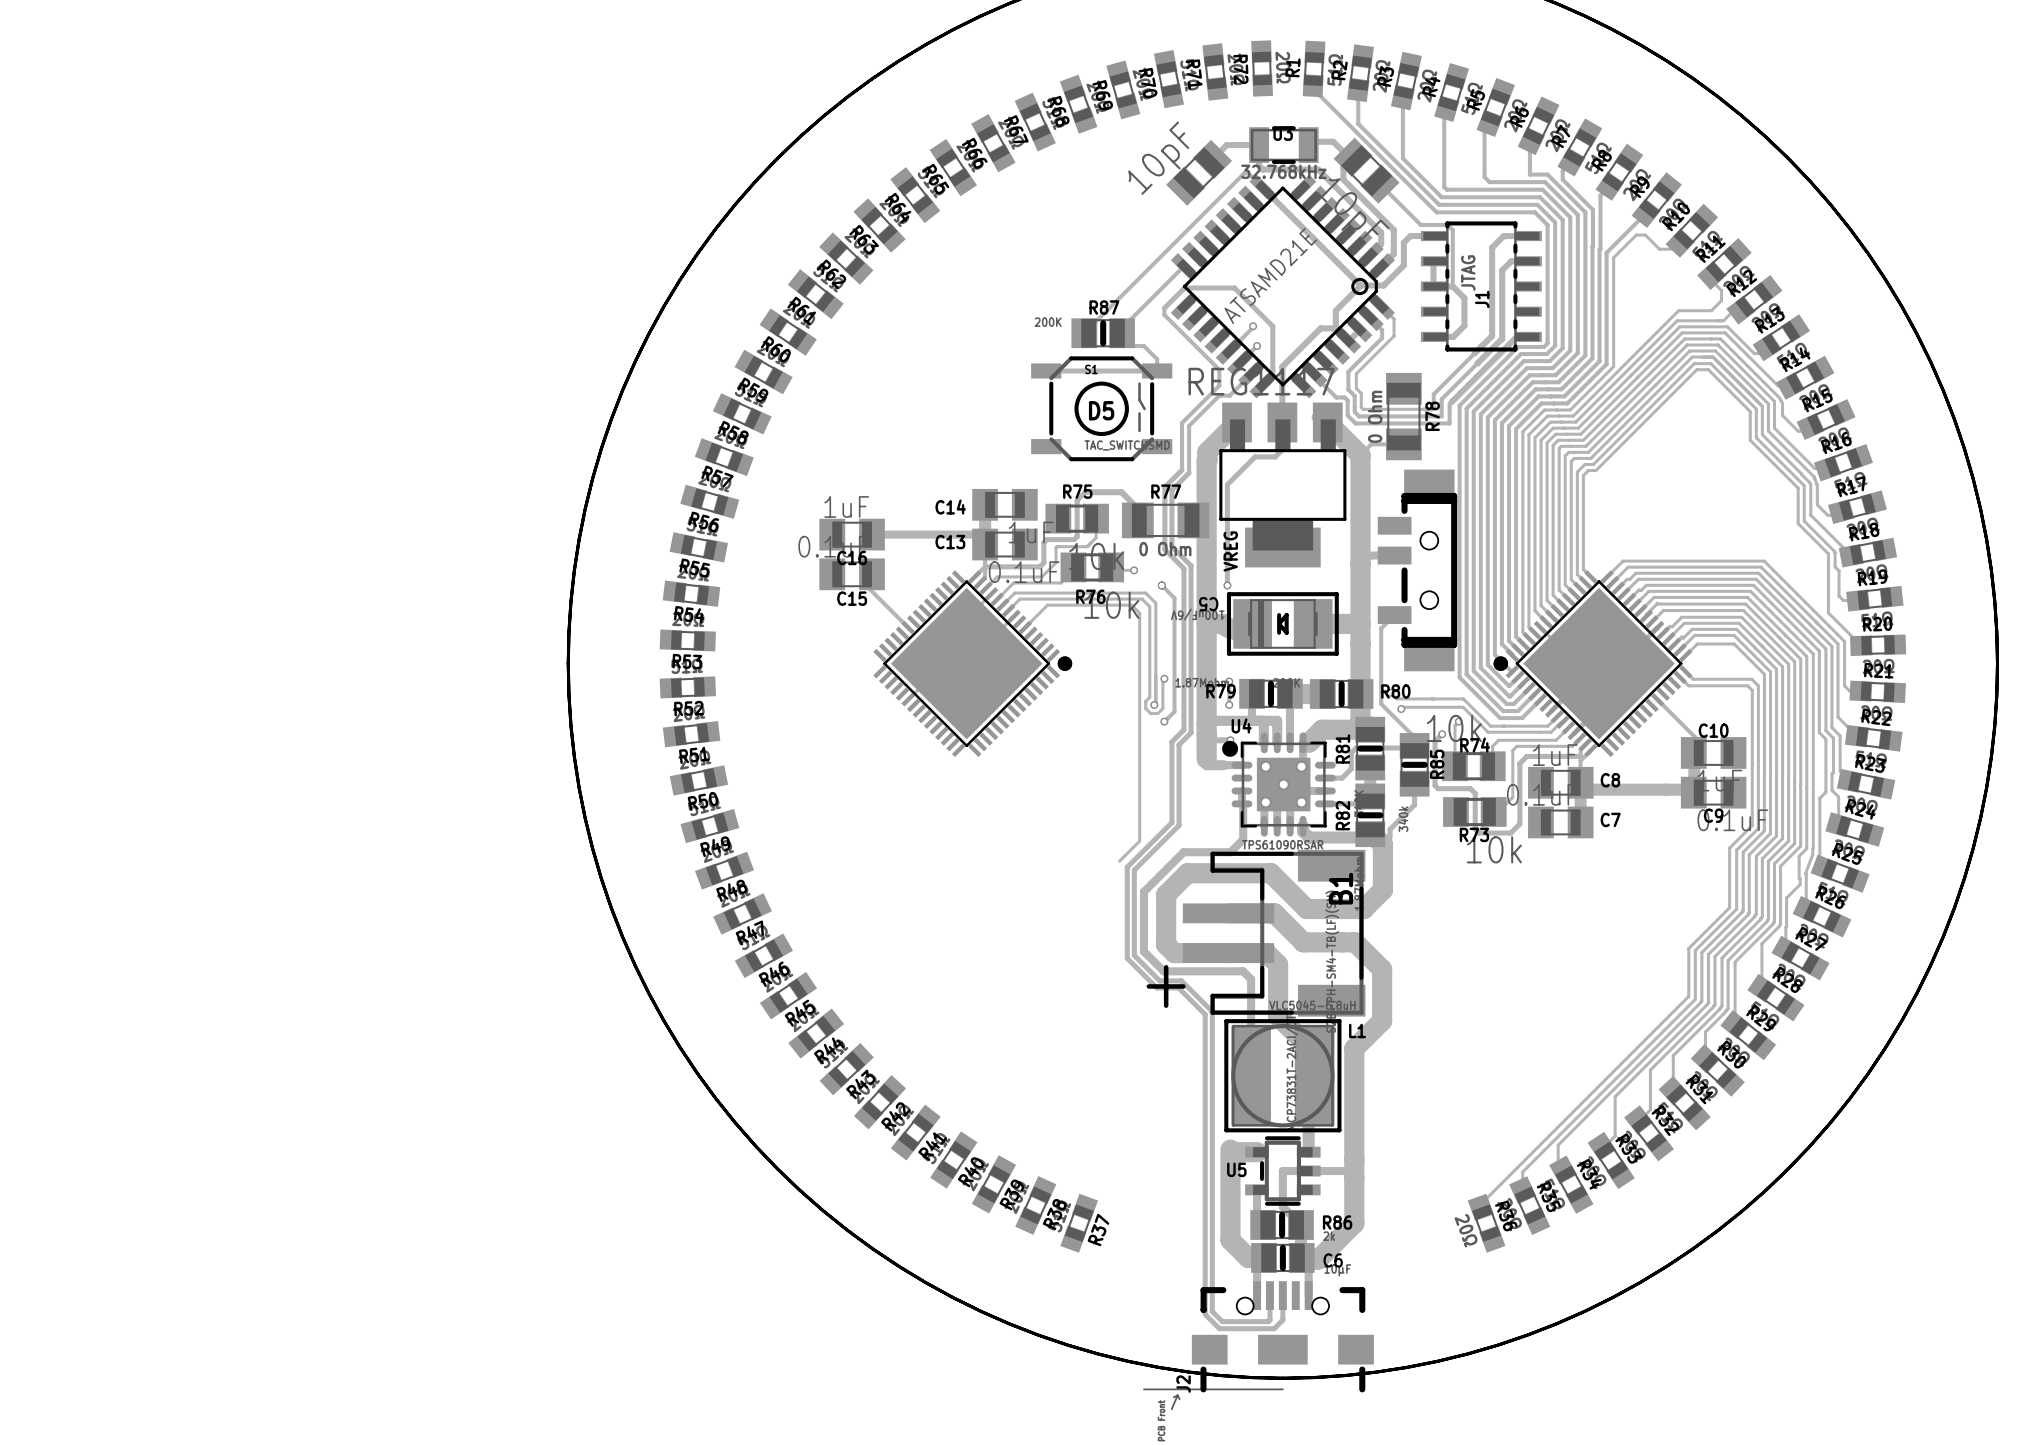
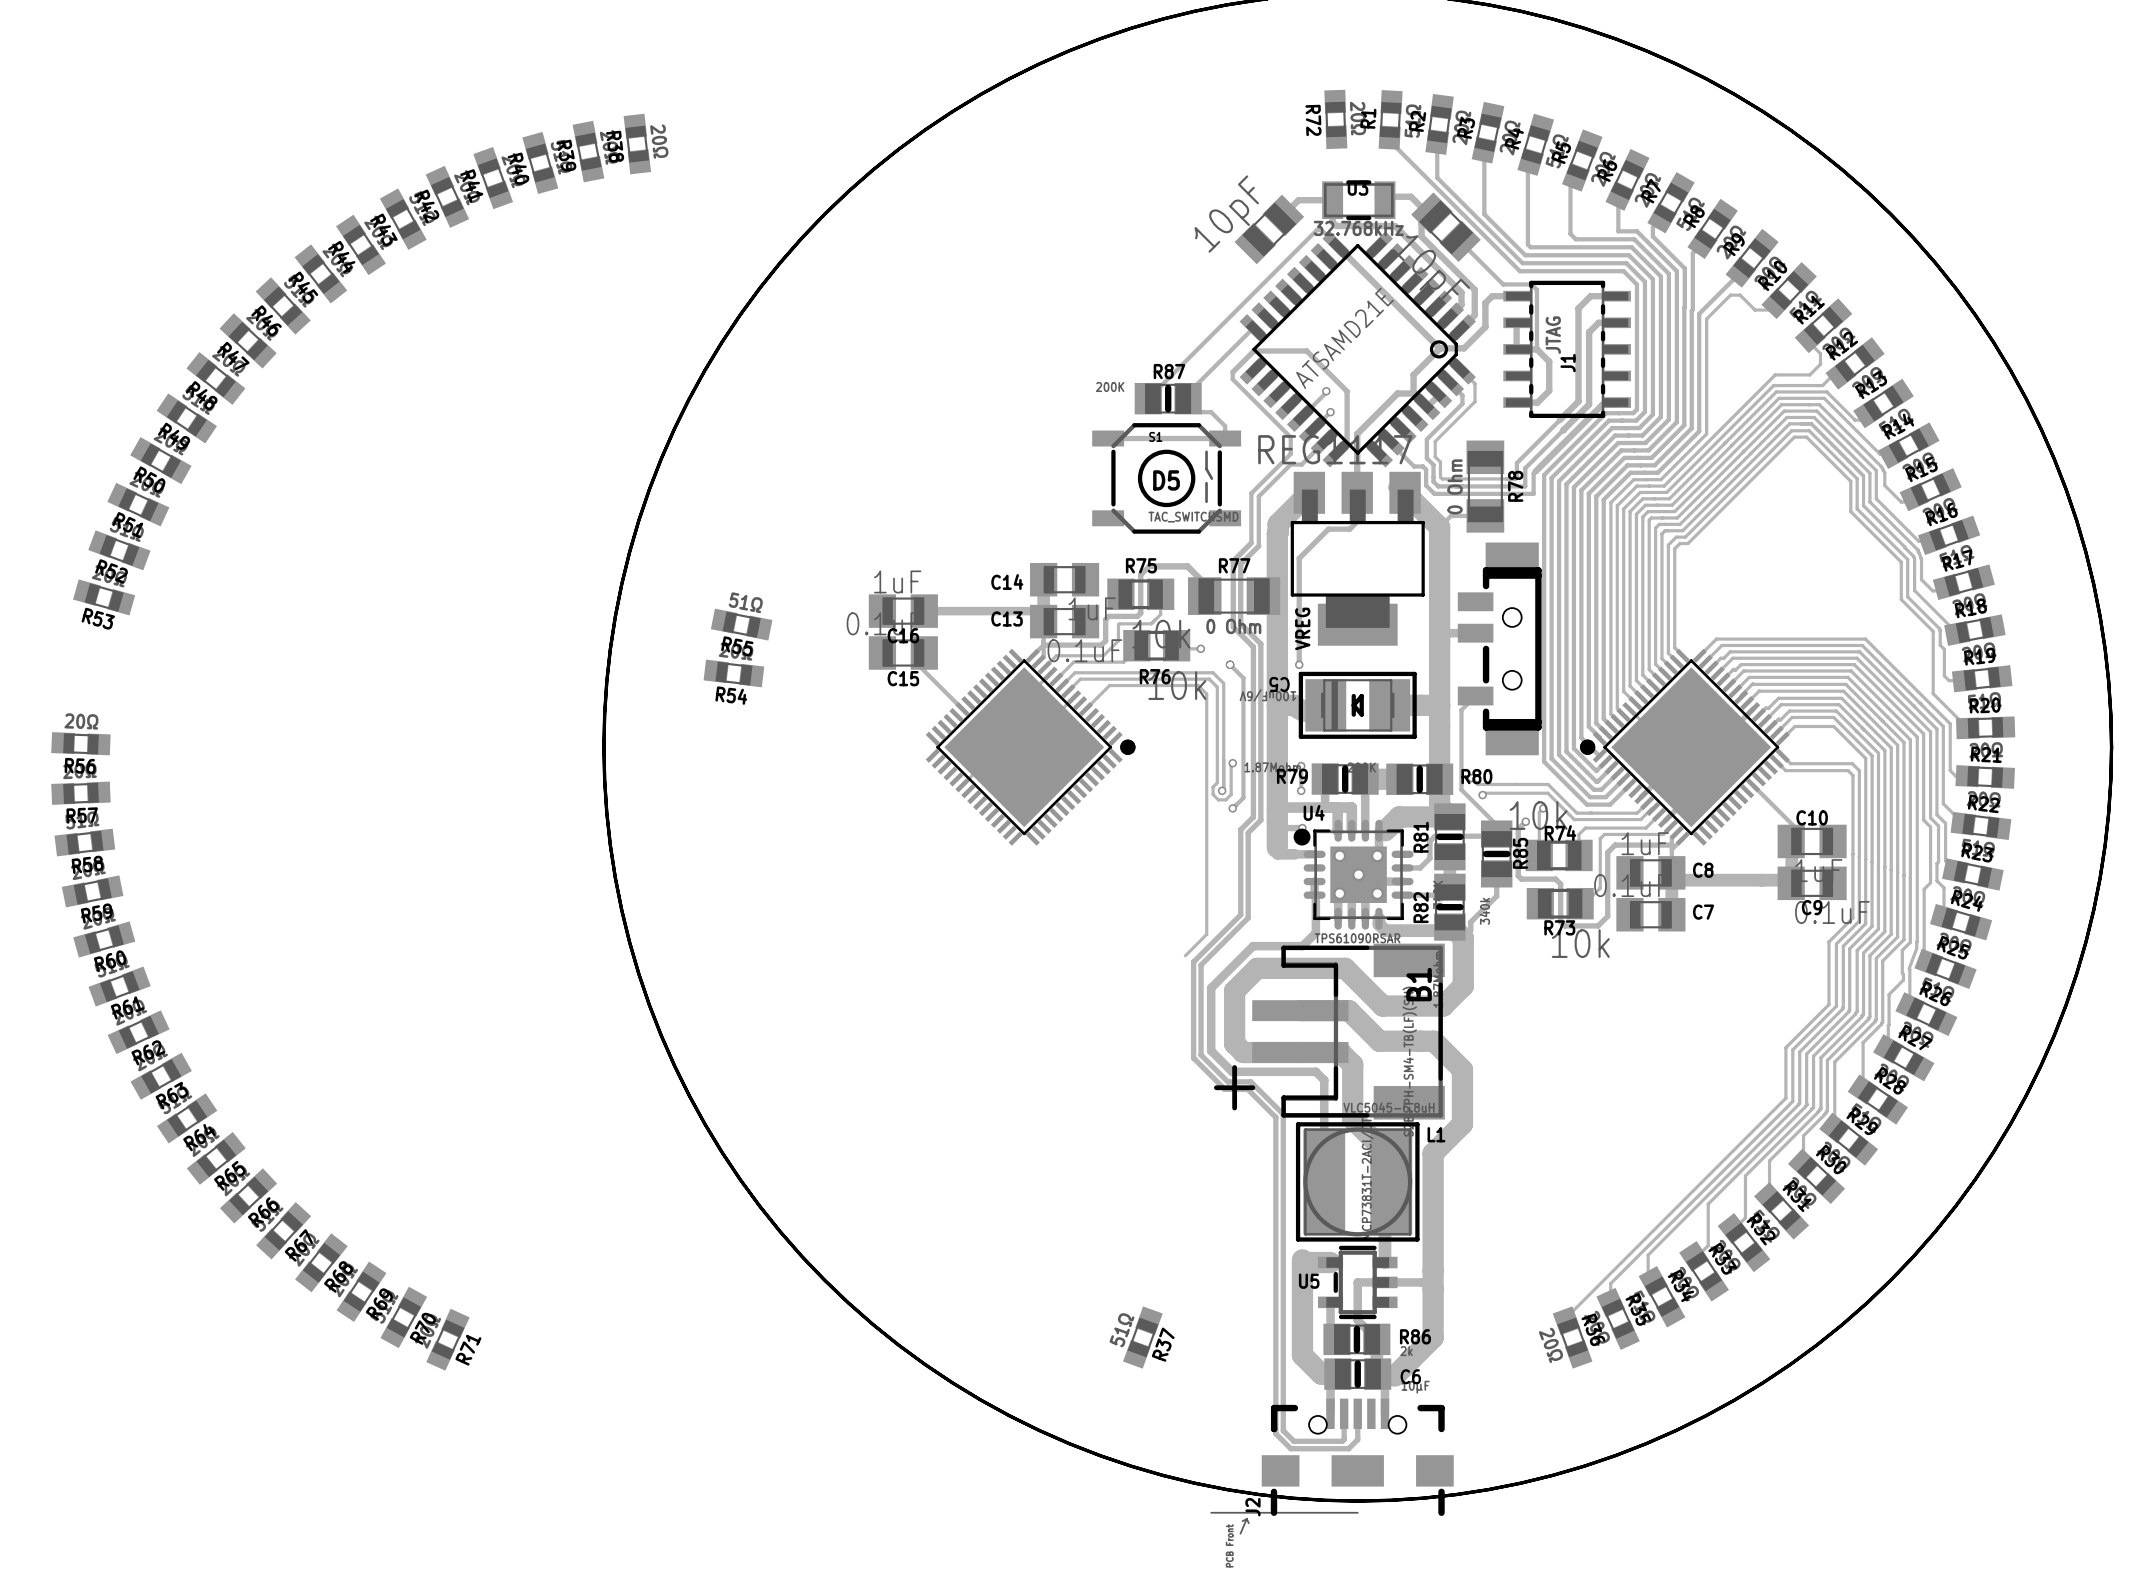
R71 rotation: 0° (1215, 71) -> 31° clockwise (447, 1339)
R71 position: (1215, 71) -> (447, 1339)
R71 name position: R71 (1194, 74) -> R71 (468, 1350)
R70 rotation: 0° (1168, 79) -> 40° clockwise (403, 1317)
R70 position: (1168, 79) -> (403, 1317)
R70 name position: R70 (1147, 82) -> R70 (422, 1328)
R69 rotation: 0° (1123, 89) -> 49.2° clockwise (361, 1291)
R69 position: (1123, 89) -> (361, 1291)
R68 rotation: 0° (1078, 104) -> 58.1° clockwise (321, 1262)
R68 position: (1078, 104) -> (321, 1262)
R67 rotation: 0° (1035, 122) -> 67.1° clockwise (283, 1230)
R67 position: (1035, 122) -> (283, 1230)
R66 rotation: 0° (993, 143) -> 76.2° clockwise (248, 1195)
R66 position: (993, 143) -> (248, 1195)
R65 rotation: 0° (953, 167) -> 85.2° clockwise (216, 1158)
R65 position: (953, 167) -> (216, 1158)
R64 rotation: 0° (915, 195) -> 85.8° counterclockwise (187, 1118)
R64 position: (915, 195) -> (187, 1118)
R63 rotation: 0° (879, 225) -> 76.8° counterclockwise (161, 1076)
R63 position: (879, 225) -> (161, 1076)
R62 rotation: 0° (846, 258) -> 67.8° counterclockwise (138, 1032)
R62 position: (846, 258) -> (138, 1032)
R61 rotation: 0° (815, 294) -> 58.6° counterclockwise (119, 986)
R61 position: (815, 294) -> (119, 986)
R60 rotation: 0° (788, 332) -> 49.6° counterclockwise (104, 939)
R60 position: (788, 332) -> (104, 939)
R59 rotation: 0° (763, 372) -> 40.7° counterclockwise (92, 891)
R59 position: (763, 372) -> (92, 891)
R58 rotation: 0° (742, 413) -> 31.6° counterclockwise (84, 842)
R58 position: (742, 413) -> (84, 842)
R57 rotation: 0° (724, 457) -> 22.6° counterclockwise (80, 793)
R57 position: (724, 457) -> (80, 793)
R56 rotation: 0° (709, 501) -> 13.5° counterclockwise (80, 743)
R56 position: (709, 501) -> (80, 743)
R53 rotation: 0° (687, 640) -> 13.5° clockwise (104, 597)
R53 position: (687, 640) -> (104, 597)
R52 rotation: 0° (687, 687) -> 22.6° clockwise (119, 550)
R52 position: (687, 687) -> (119, 550)
R51 rotation: 0° (691, 734) -> 31.6° clockwise (138, 504)
R51 position: (691, 734) -> (138, 504)
R50 rotation: 0° (698, 780) -> 40.7° clockwise (160, 460)
R50 position: (698, 780) -> (160, 460)
R49 rotation: 0° (709, 826) -> 49.6° clockwise (186, 418)
R49 position: (709, 826) -> (186, 418)
R48 rotation: 0° (724, 870) -> 58.6° clockwise (215, 378)
R48 position: (724, 870) -> (215, 378)
R47 rotation: 0° (742, 913) -> 67.8° clockwise (248, 340)
R47 position: (742, 913) -> (248, 340)
R46 rotation: 0° (763, 955) -> 76.8° clockwise (283, 305)
R46 position: (763, 955) -> (283, 305)
R45 rotation: 0° (788, 995) -> 85.8° clockwise (320, 273)
R45 position: (788, 995) -> (320, 273)
R44 rotation: 0° (816, 1033) -> 85.2° counterclockwise (361, 244)
R44 position: (816, 1033) -> (361, 244)
R43 rotation: 0° (846, 1069) -> 76.2° counterclockwise (403, 219)
R43 position: (846, 1069) -> (403, 219)
R42 rotation: 0° (880, 1102) -> 67.1° counterclockwise (447, 196)
R42 position: (880, 1102) -> (447, 196)
R41 rotation: 0° (915, 1132) -> 58.1° counterclockwise (493, 178)
R41 position: (915, 1132) -> (493, 178)
R40 rotation: 0° (953, 1159) -> 49.2° counterclockwise (540, 162)
R40 position: (953, 1159) -> (540, 162)
R39 rotation: 0° (993, 1184) -> 40° counterclockwise (588, 151)
R39 position: (993, 1184) -> (588, 151)
R39 name position: R39 (1011, 1194) -> R39 (566, 155)
R38 rotation: 0° (1035, 1205) -> 31° counterclockwise (637, 144)
R38 position: (1035, 1205) -> (637, 144)
R38 name position: R38 (1054, 1214) -> R38 (615, 146)

